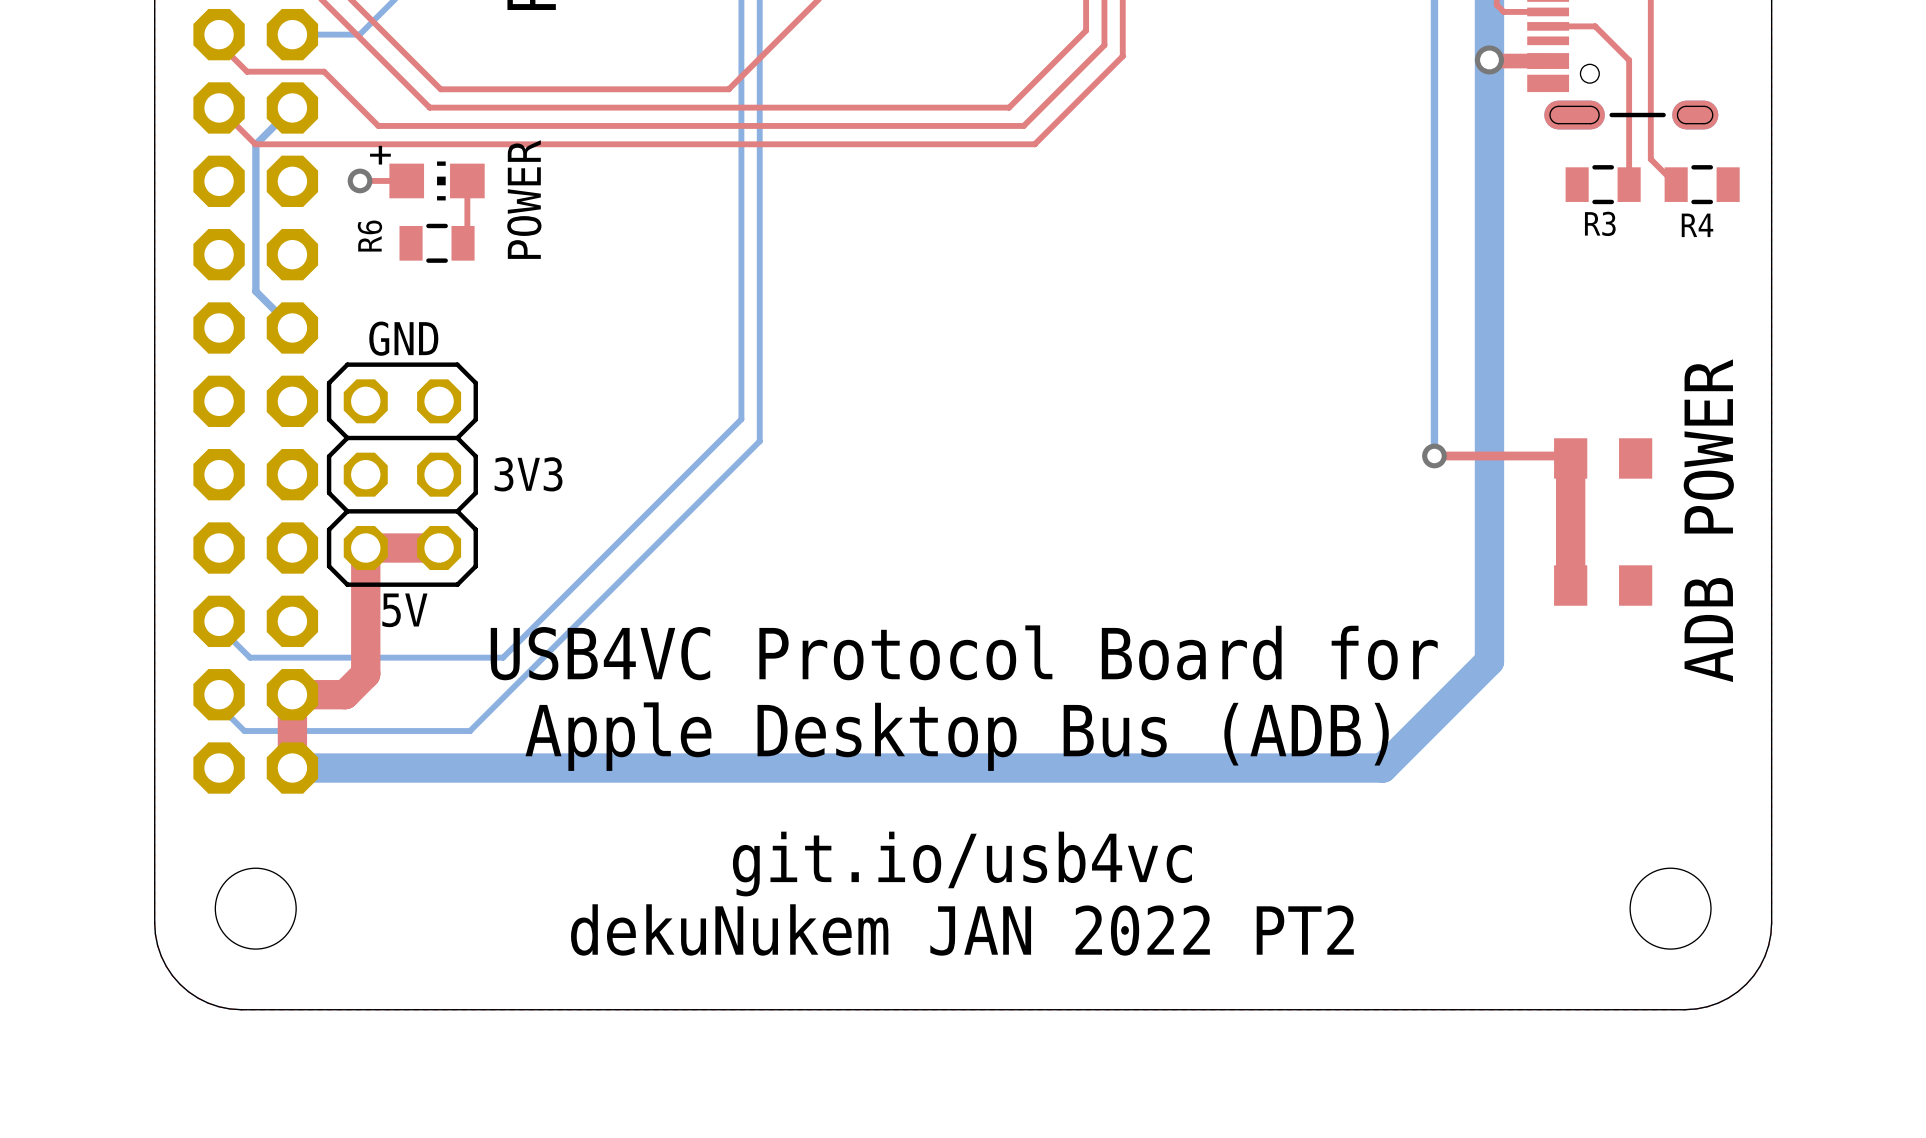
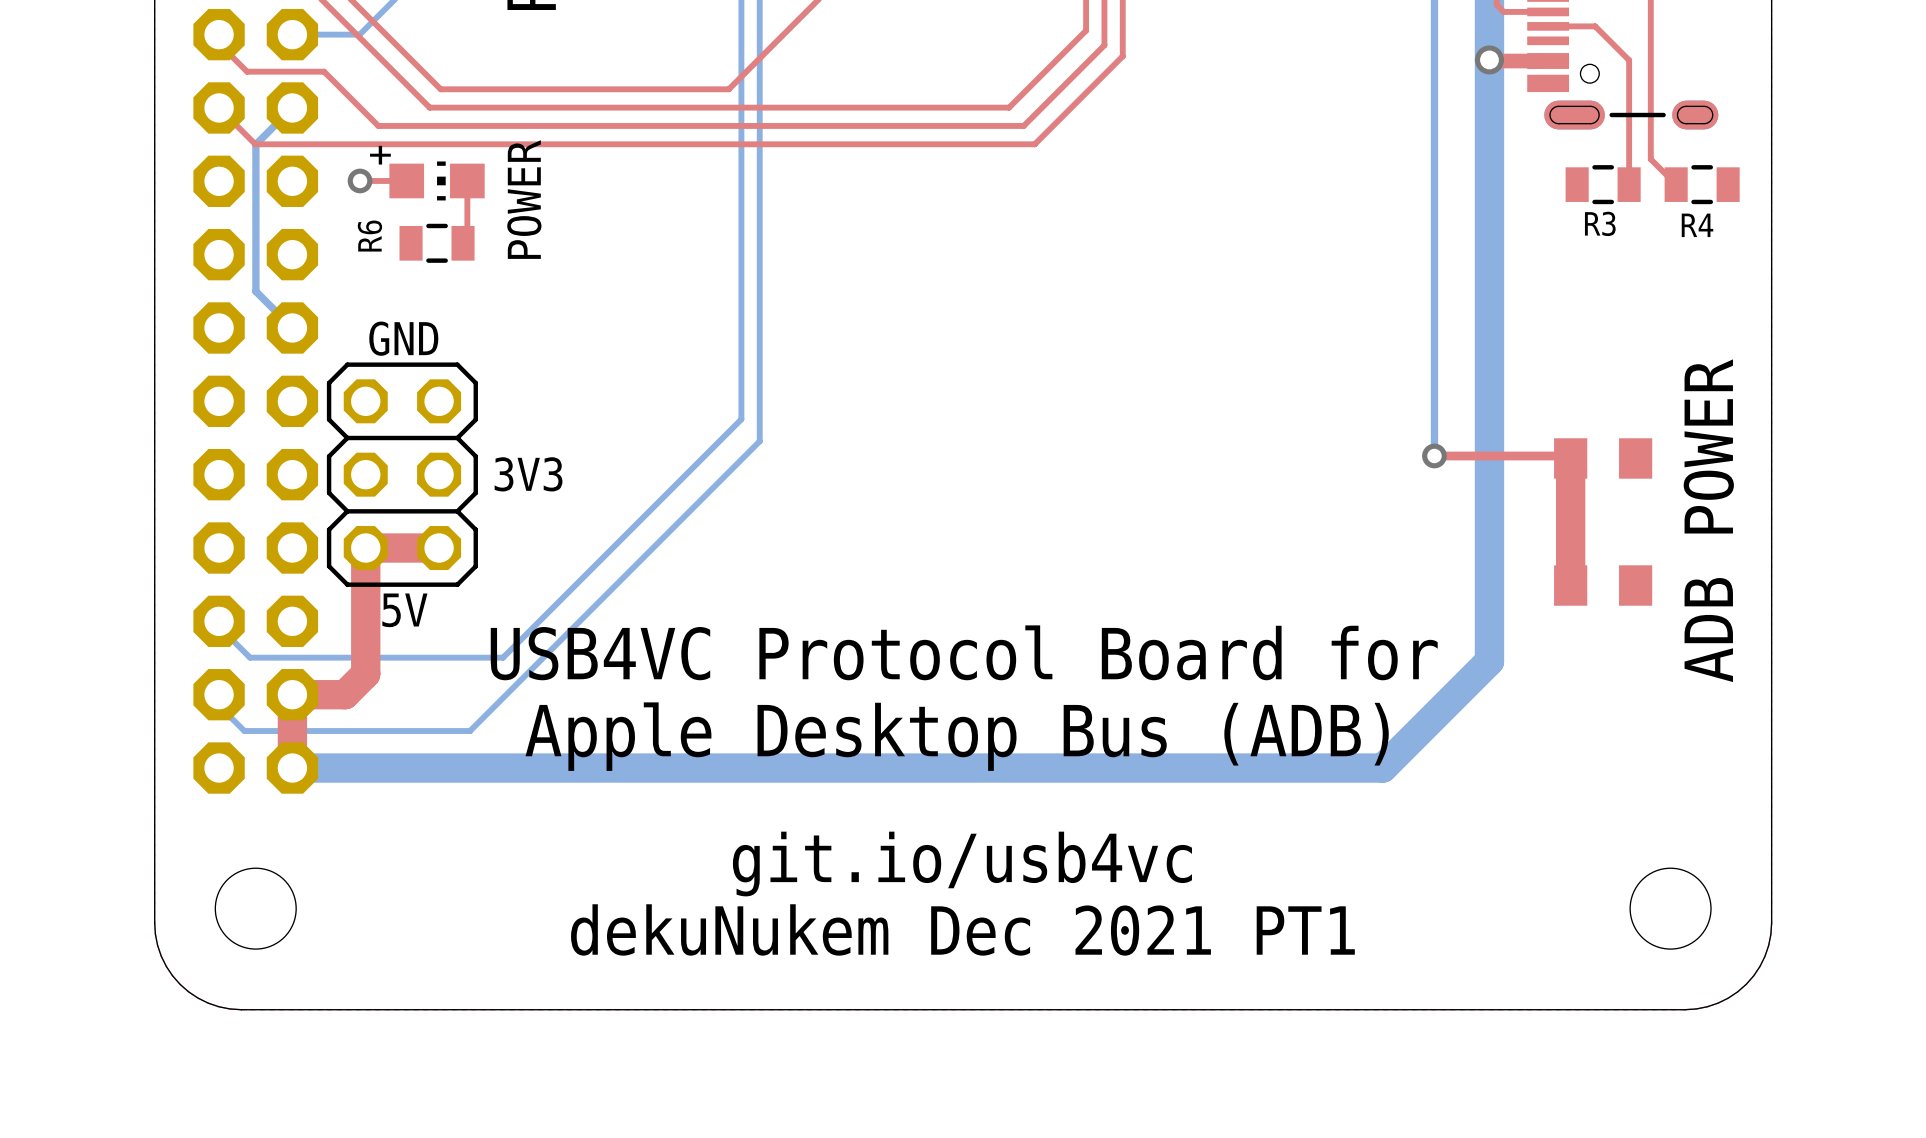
text: dekuNukem JAN 2022 PT2 (962, 929) -> dekuNukem Dec 2021 PT1 (962, 929)

